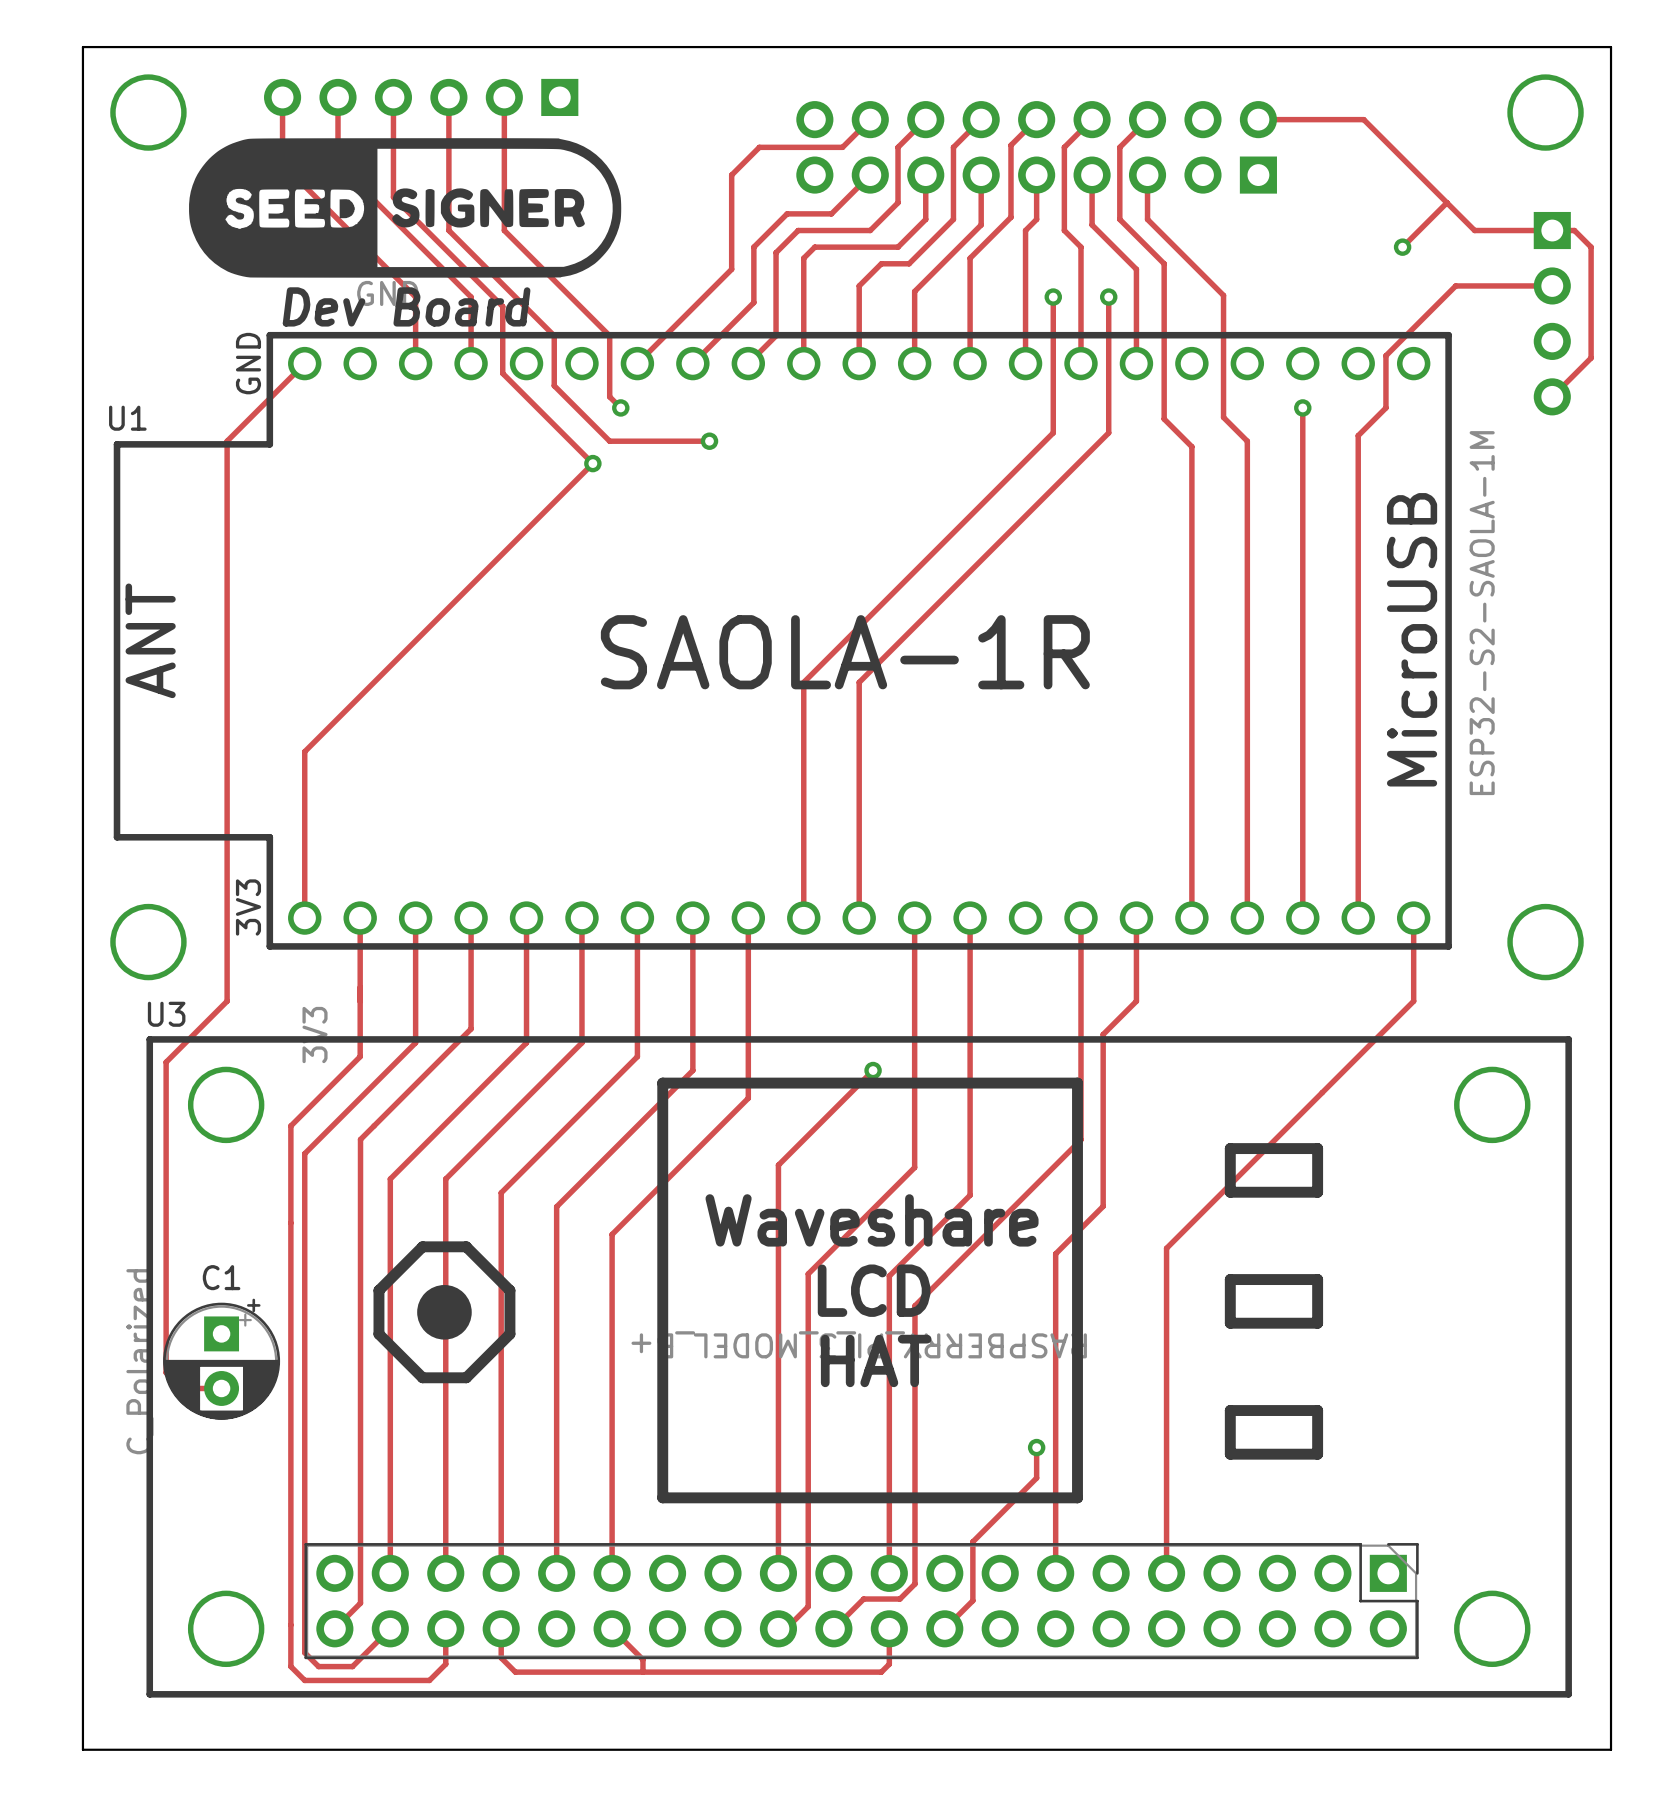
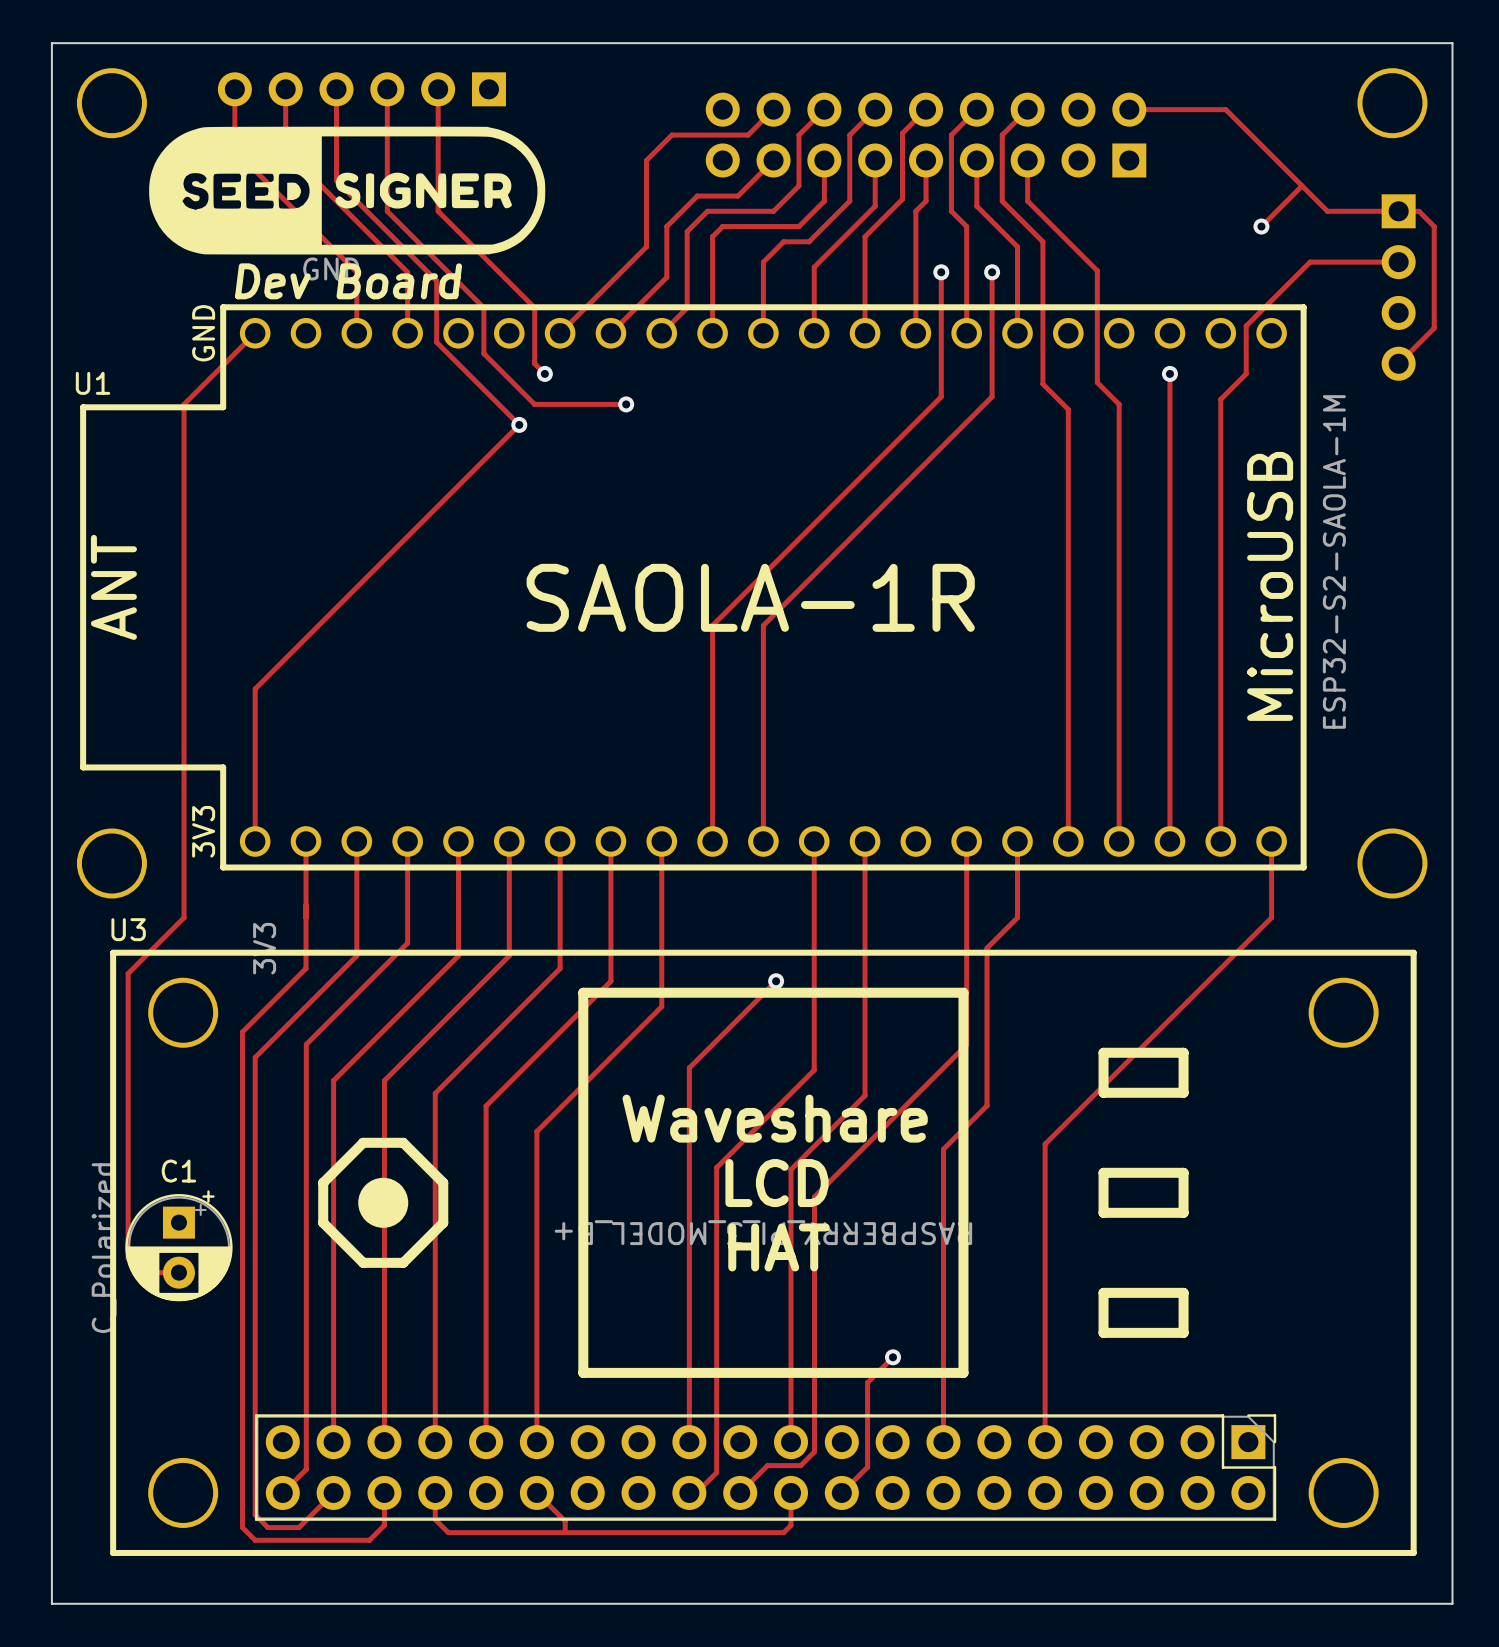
track: (1036, 1447) (1036, 1478) (972, 1541) -> (892, 1357) (867, 1382) (867, 1413)
via position: (1036, 1447) -> (892, 1357)

